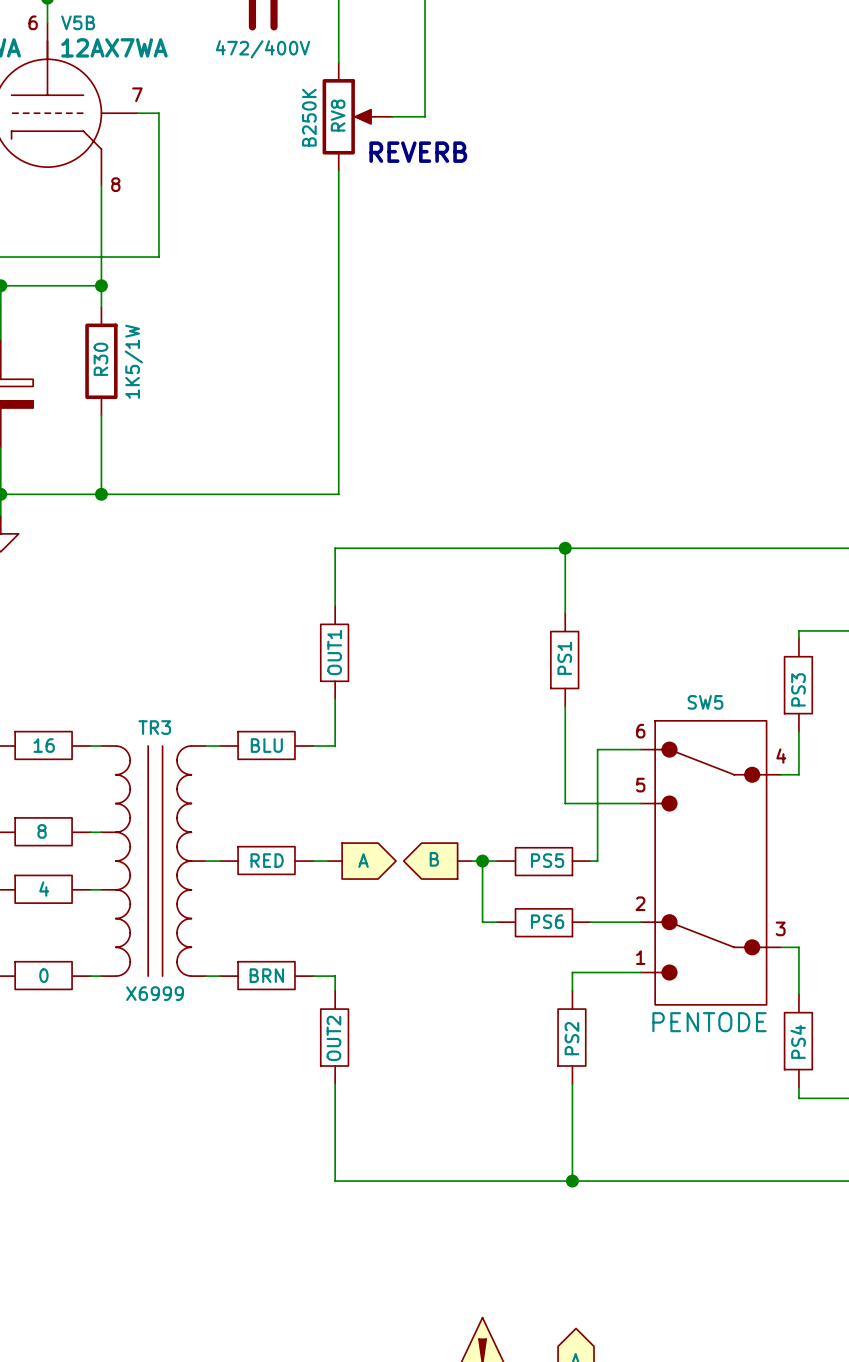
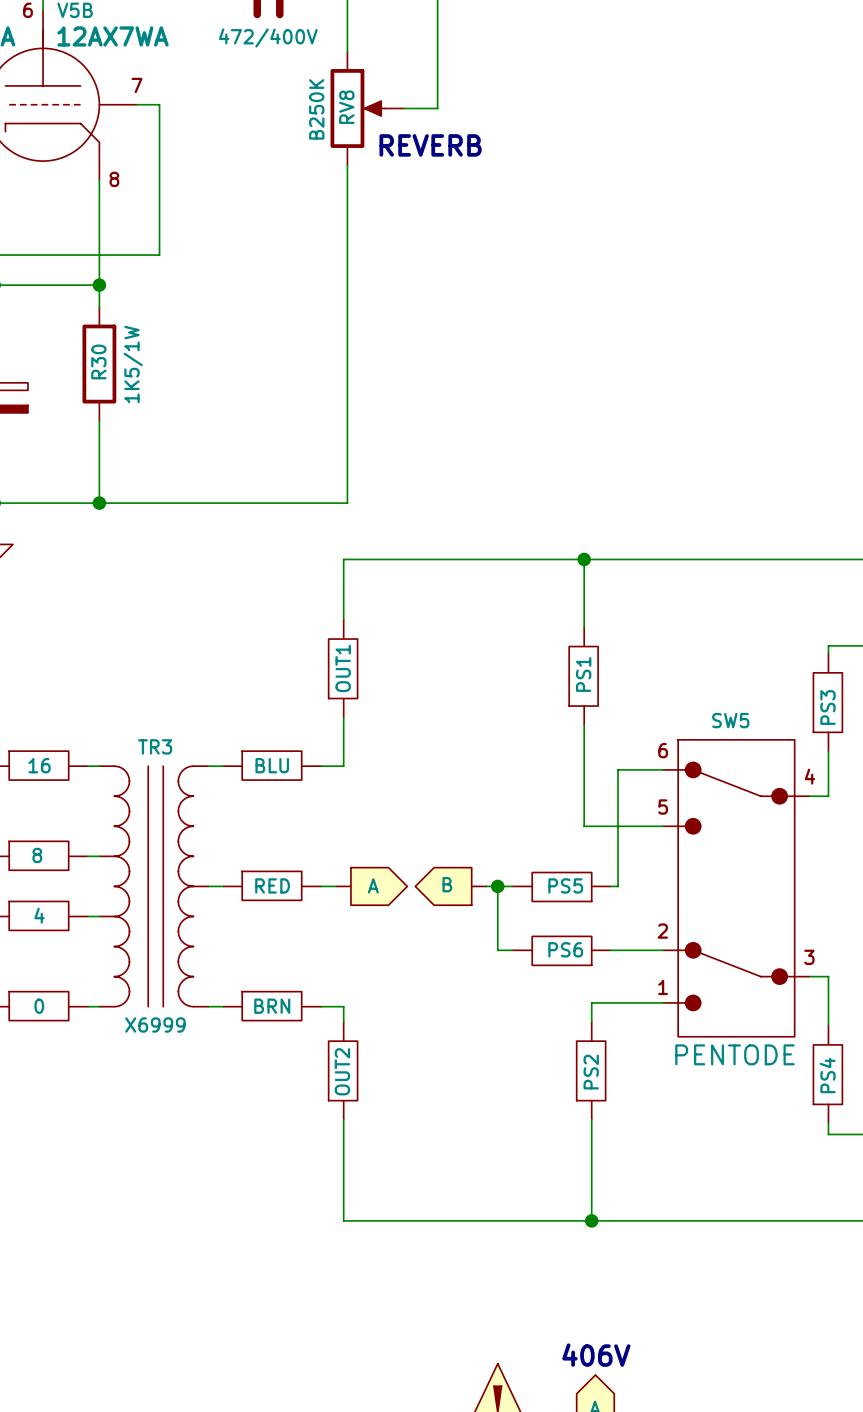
text: none -> 406V (596, 1355)

